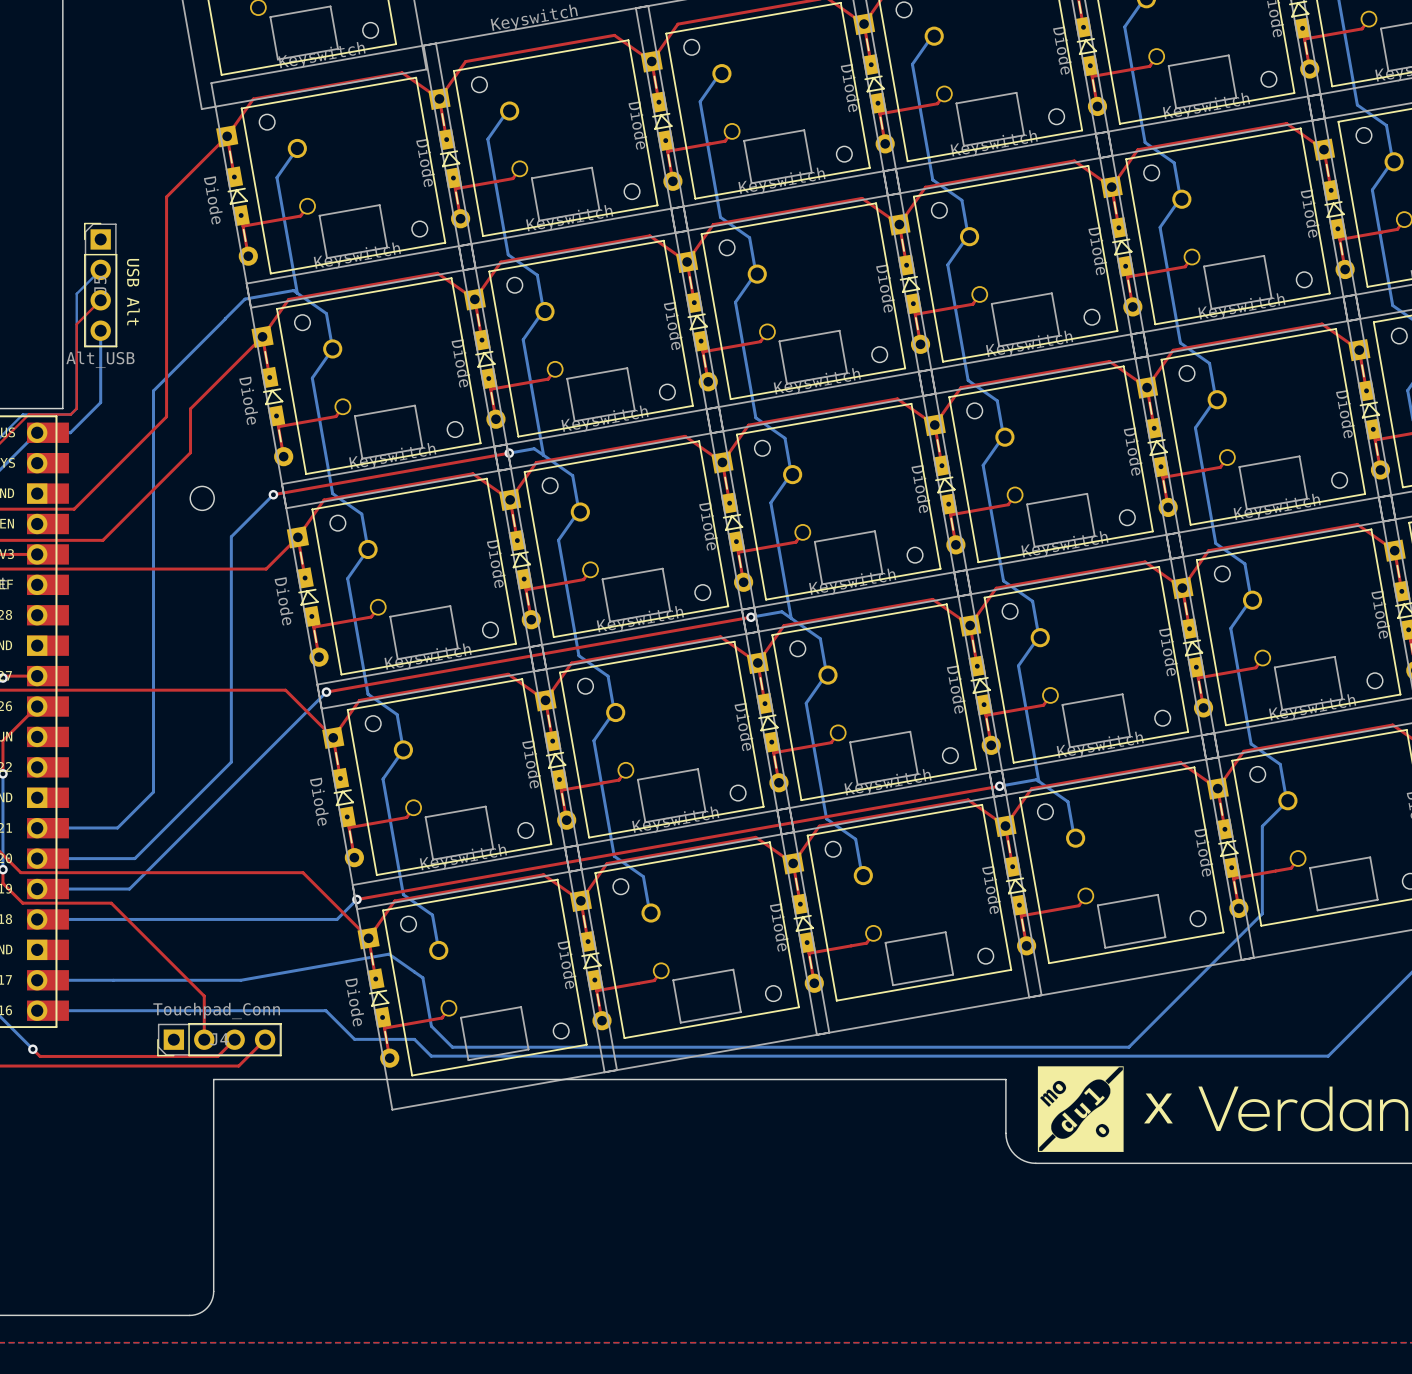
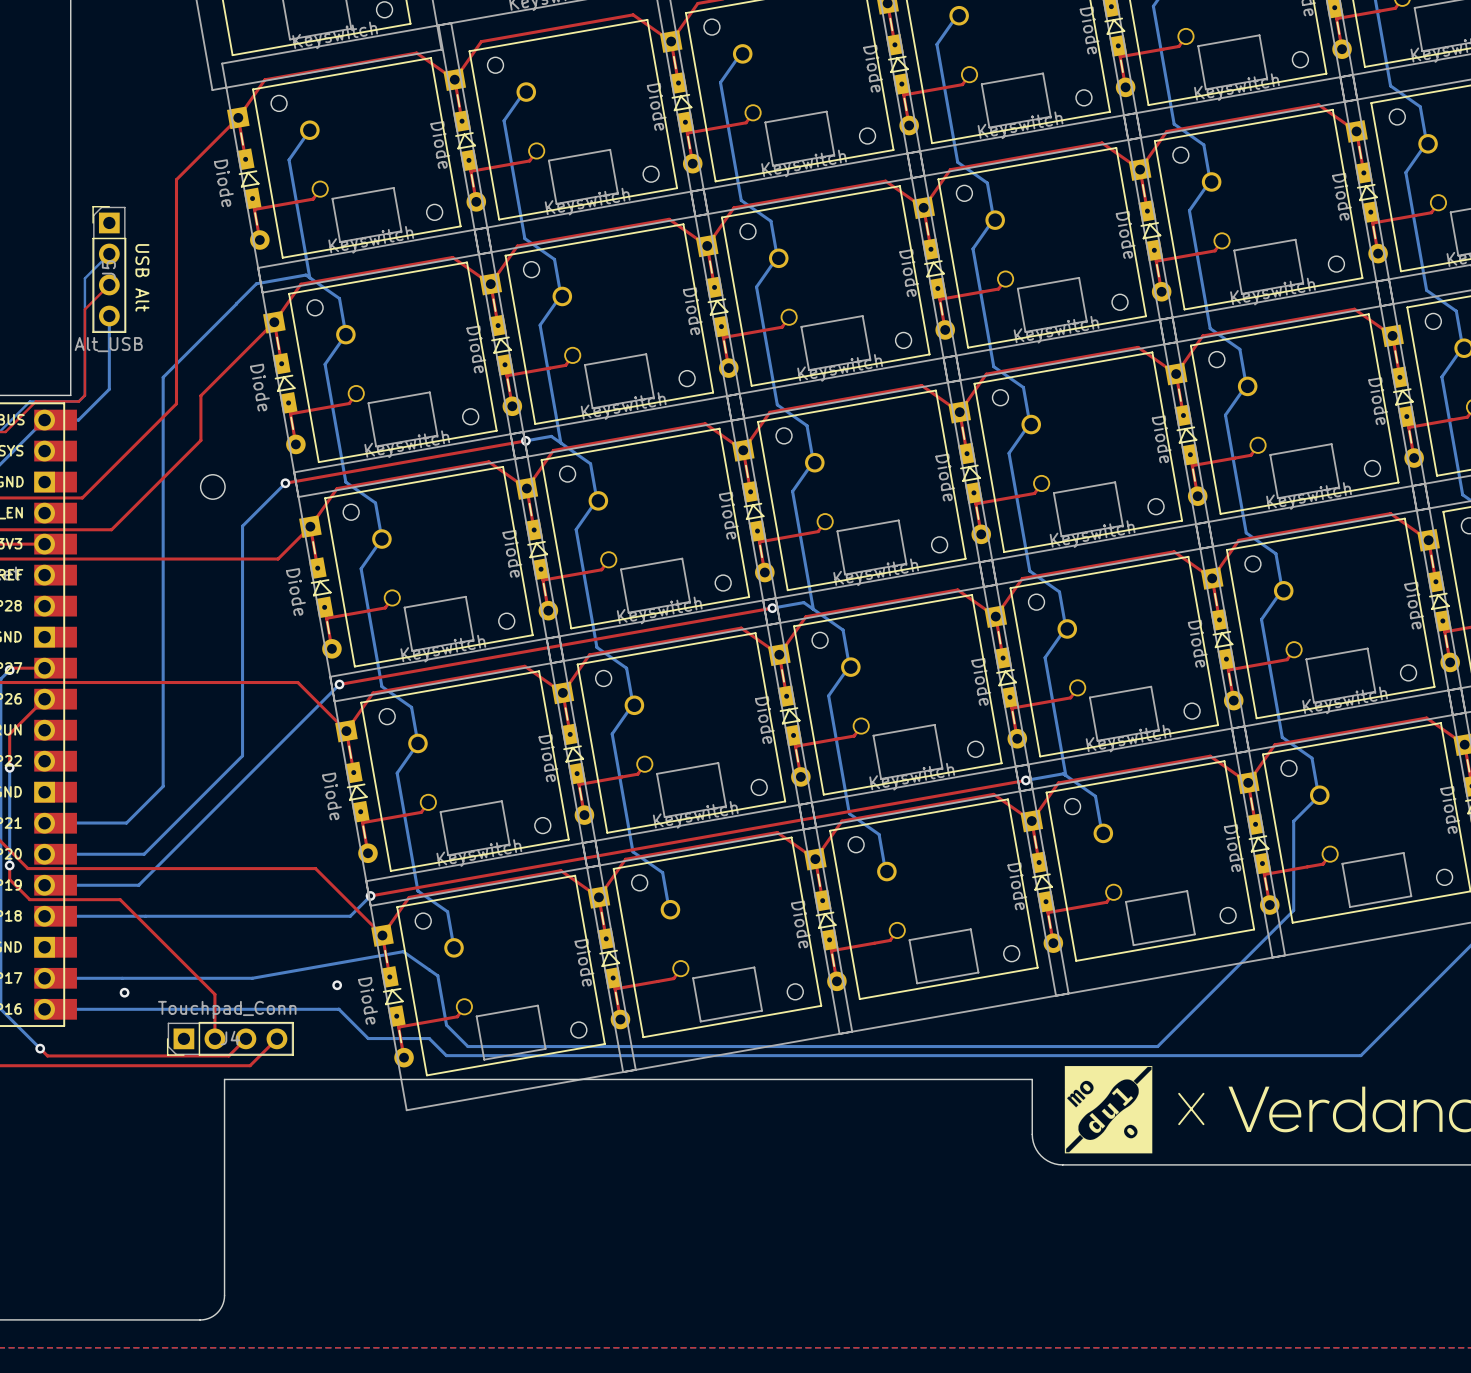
via: none -> (337, 985)
via: none -> (124, 992)

